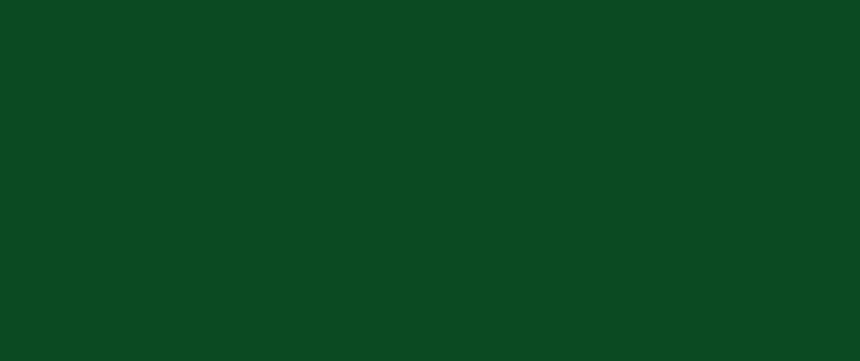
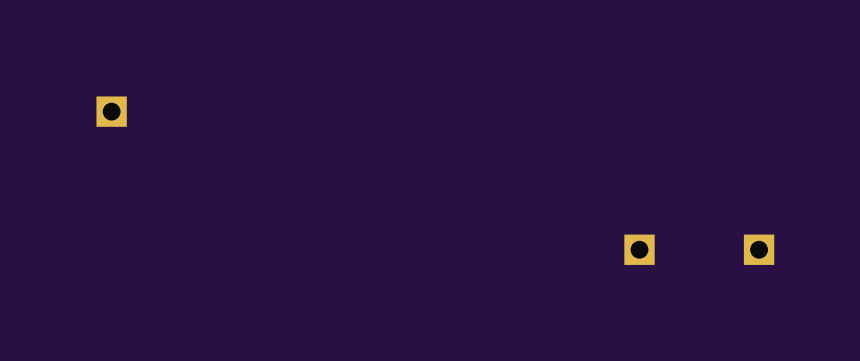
part: none -> (111, 111)
part: none -> (639, 249)
part: none -> (759, 249)

